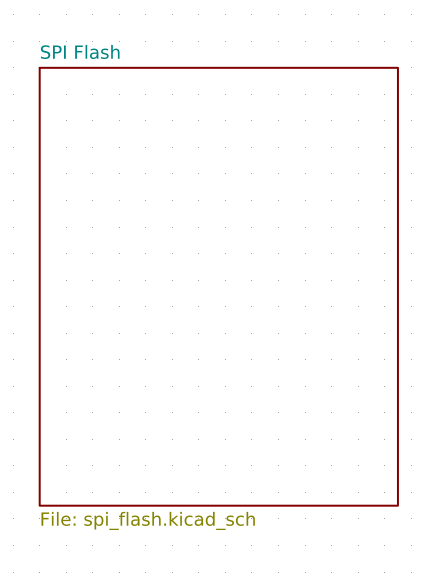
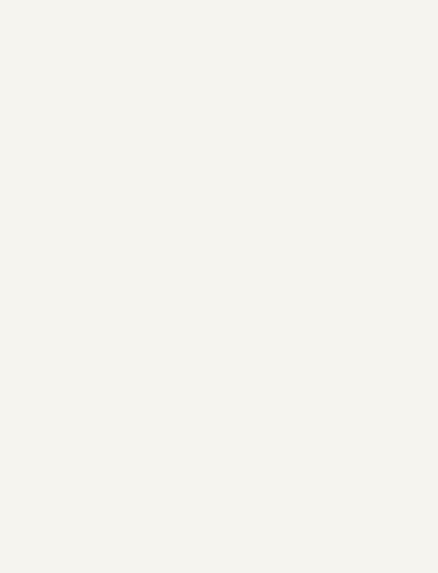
sheet SPI Flash: File: spi_flash.kicad_sch (218, 286) -> none

